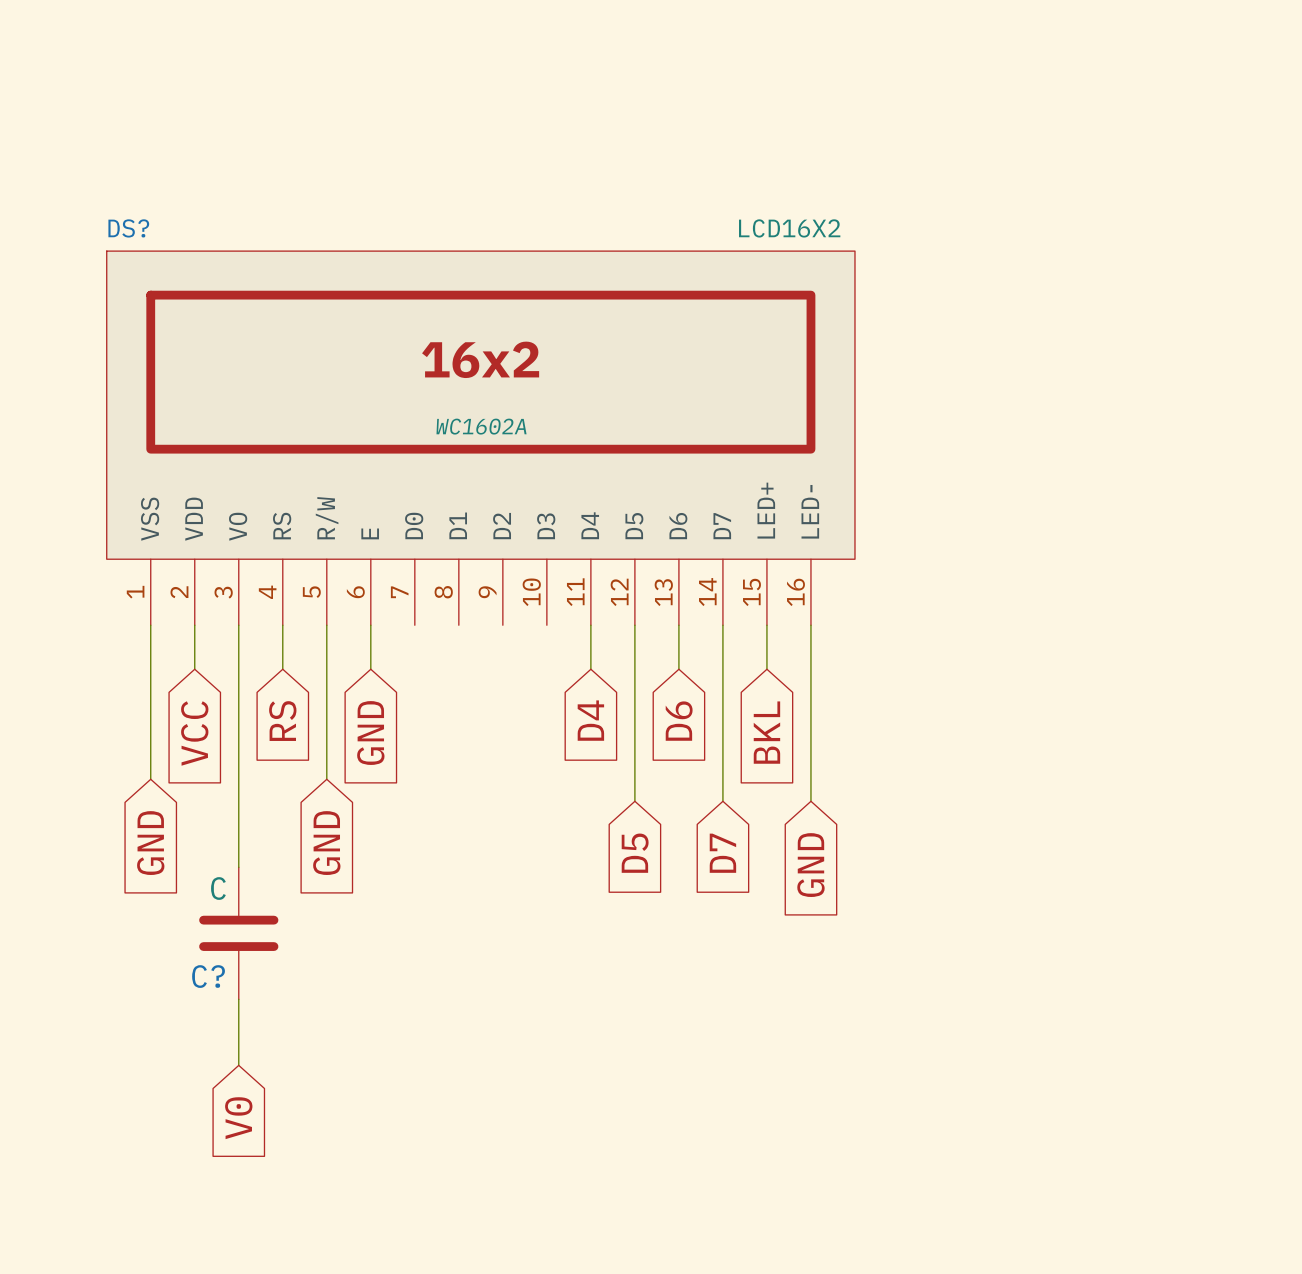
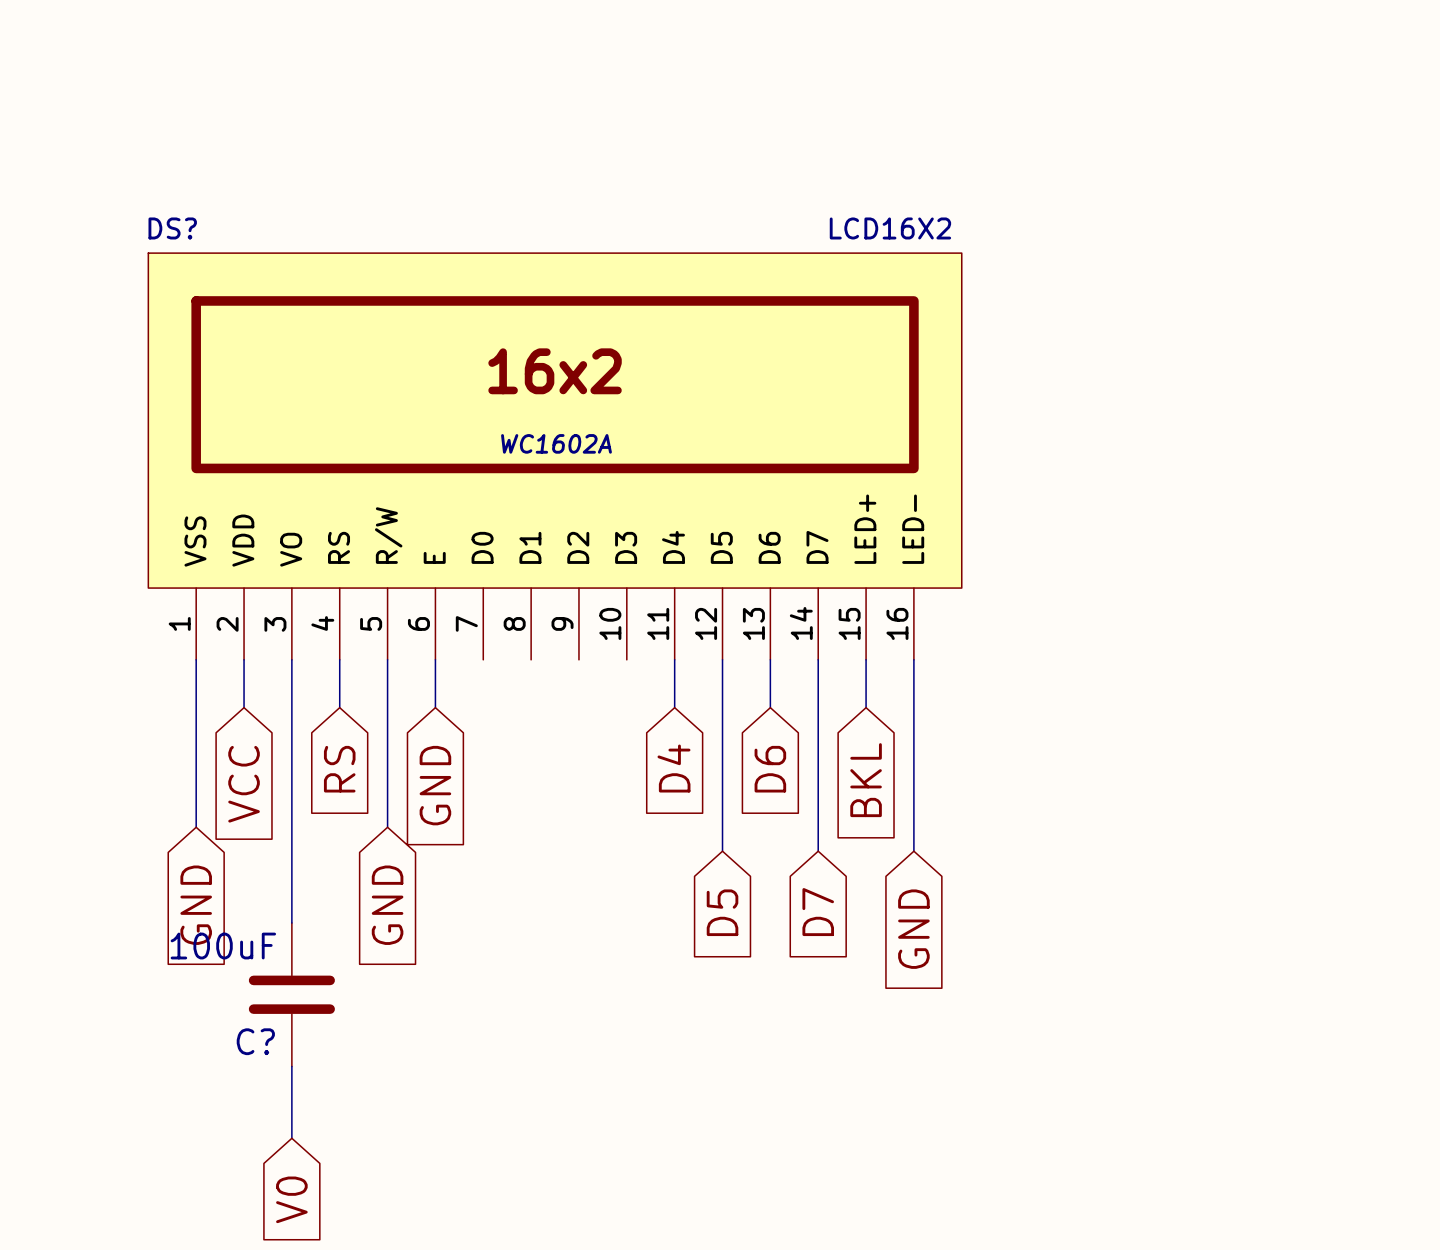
C? value: C (218, 888) -> 100uF (223, 946)

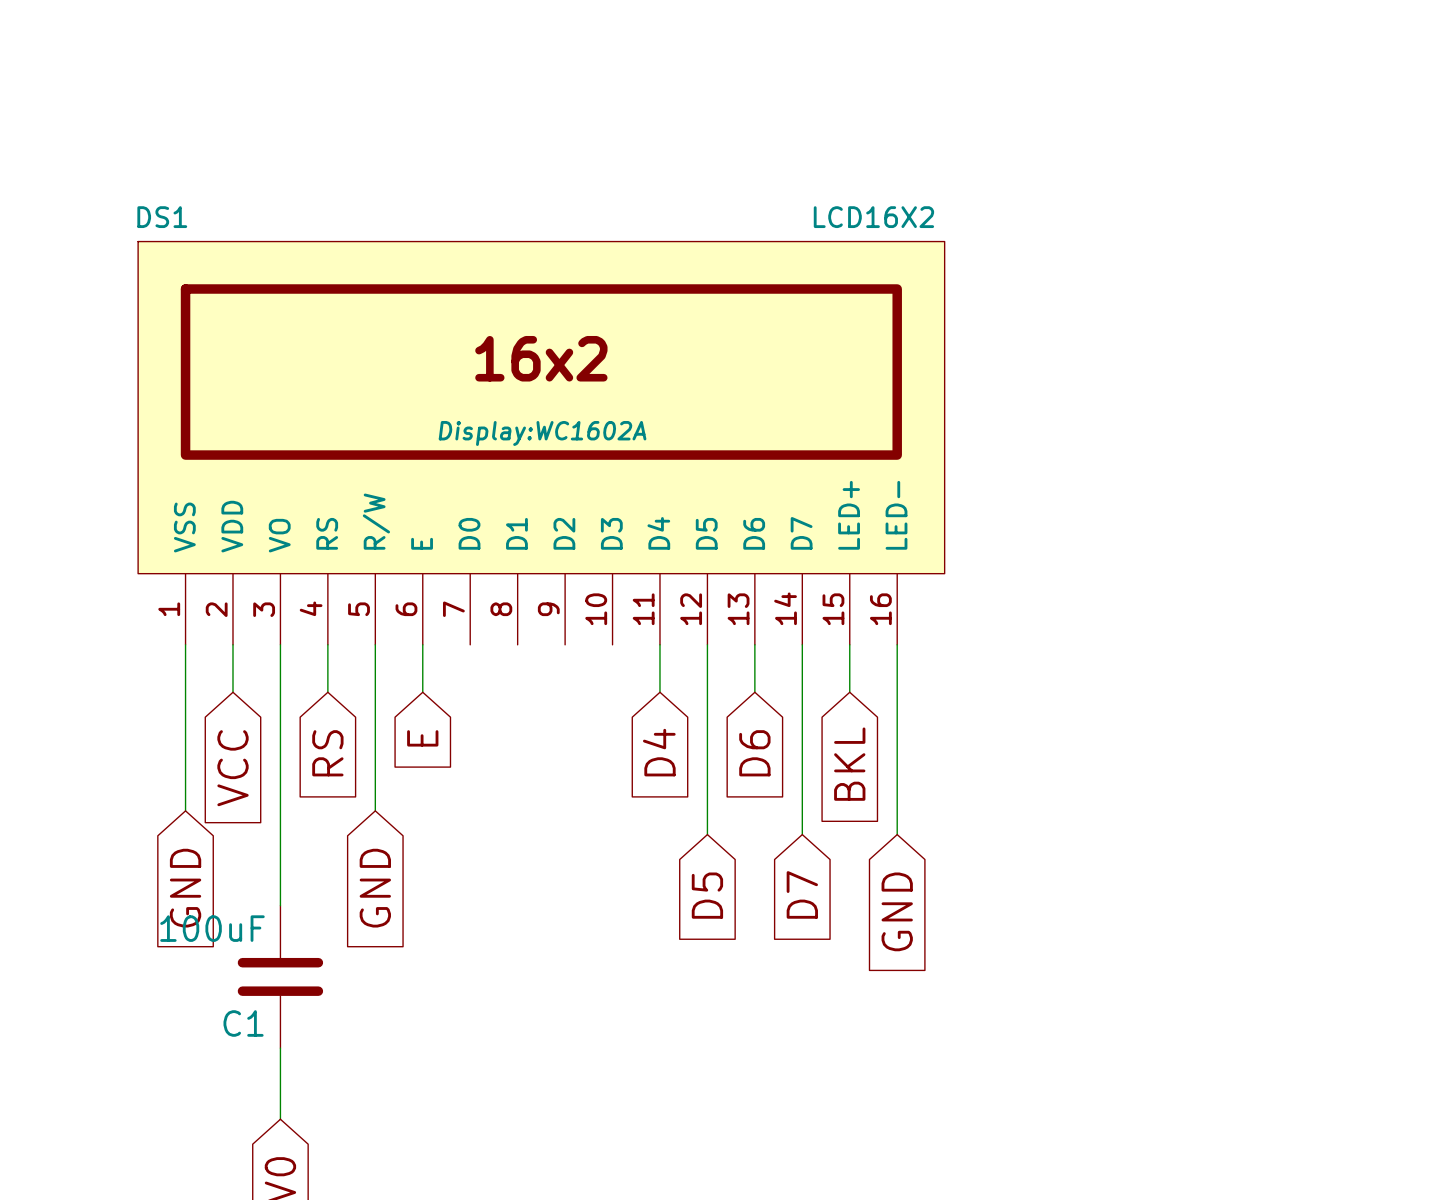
DS? name: DS? (172, 228) -> DS1 (162, 217)
DS? text: WC1602A (556, 443) -> Display:WC1602A (542, 433)
global label: GND (435, 785) -> E (422, 738)
C? name: C? (255, 1041) -> C1 (243, 1023)

